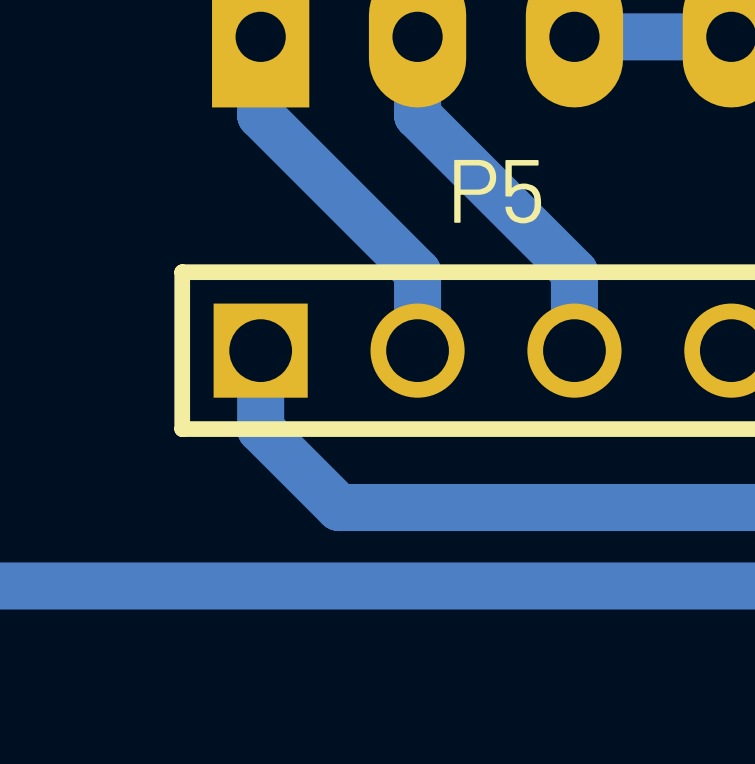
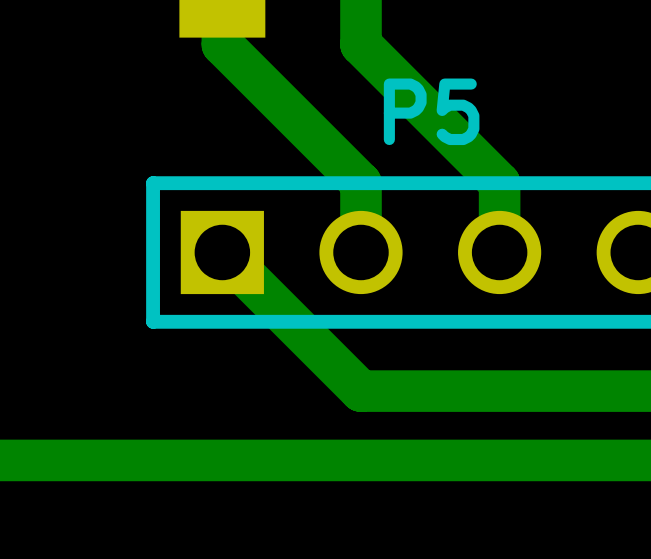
bottom track: (260, 350) (260, 429) (339, 507) (417, 507) -> (222, 252) (360, 391)

